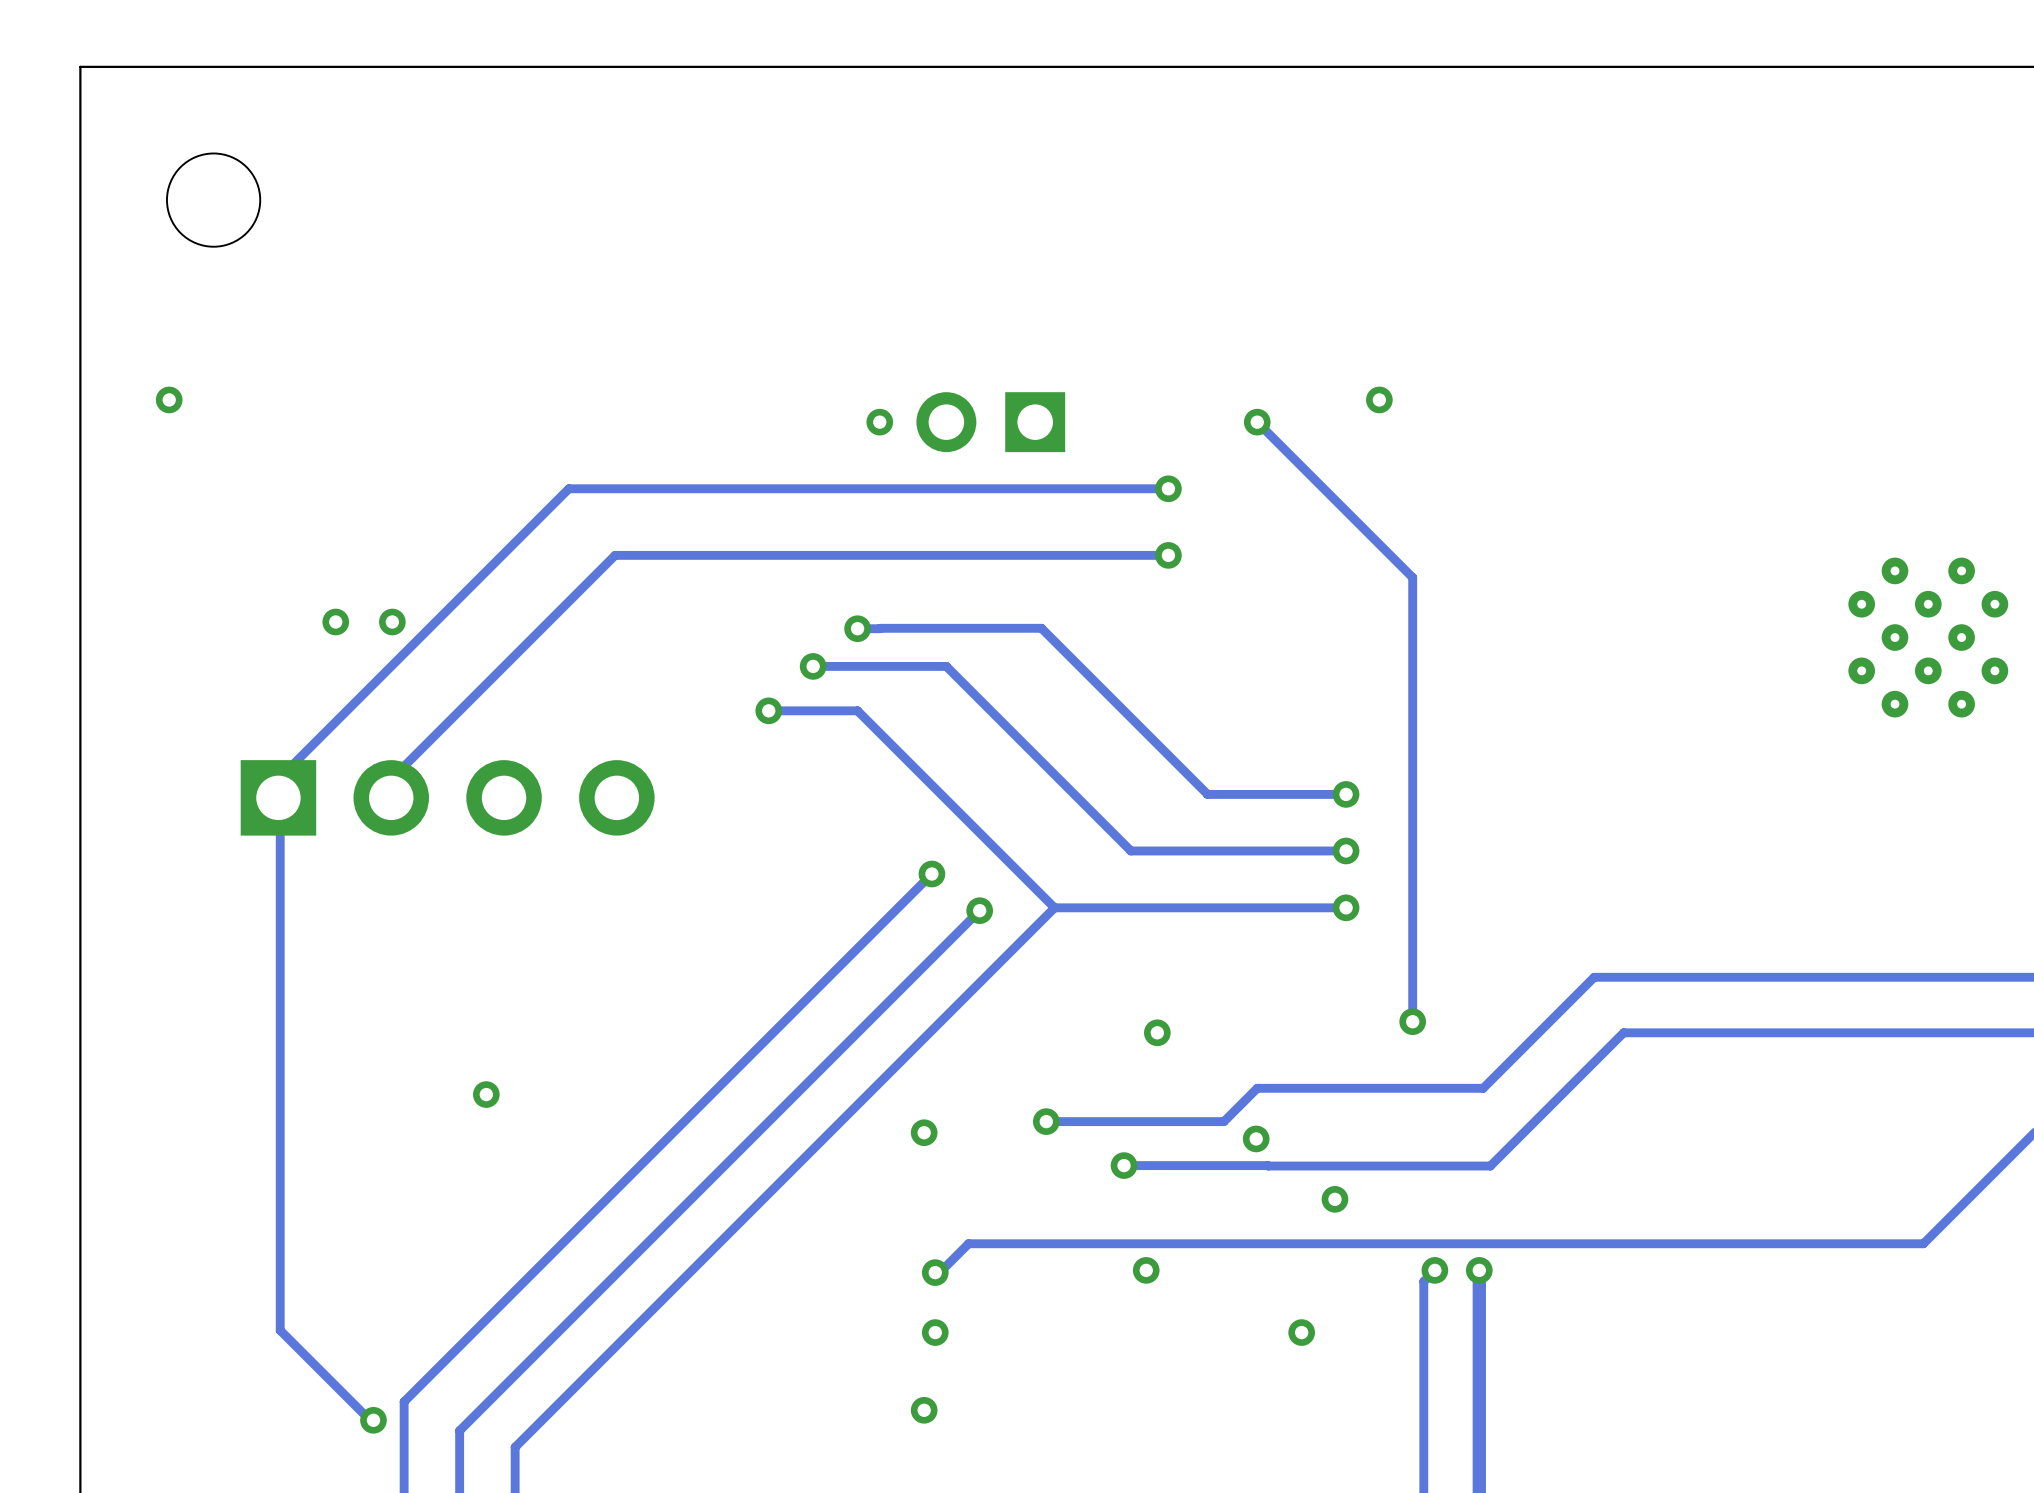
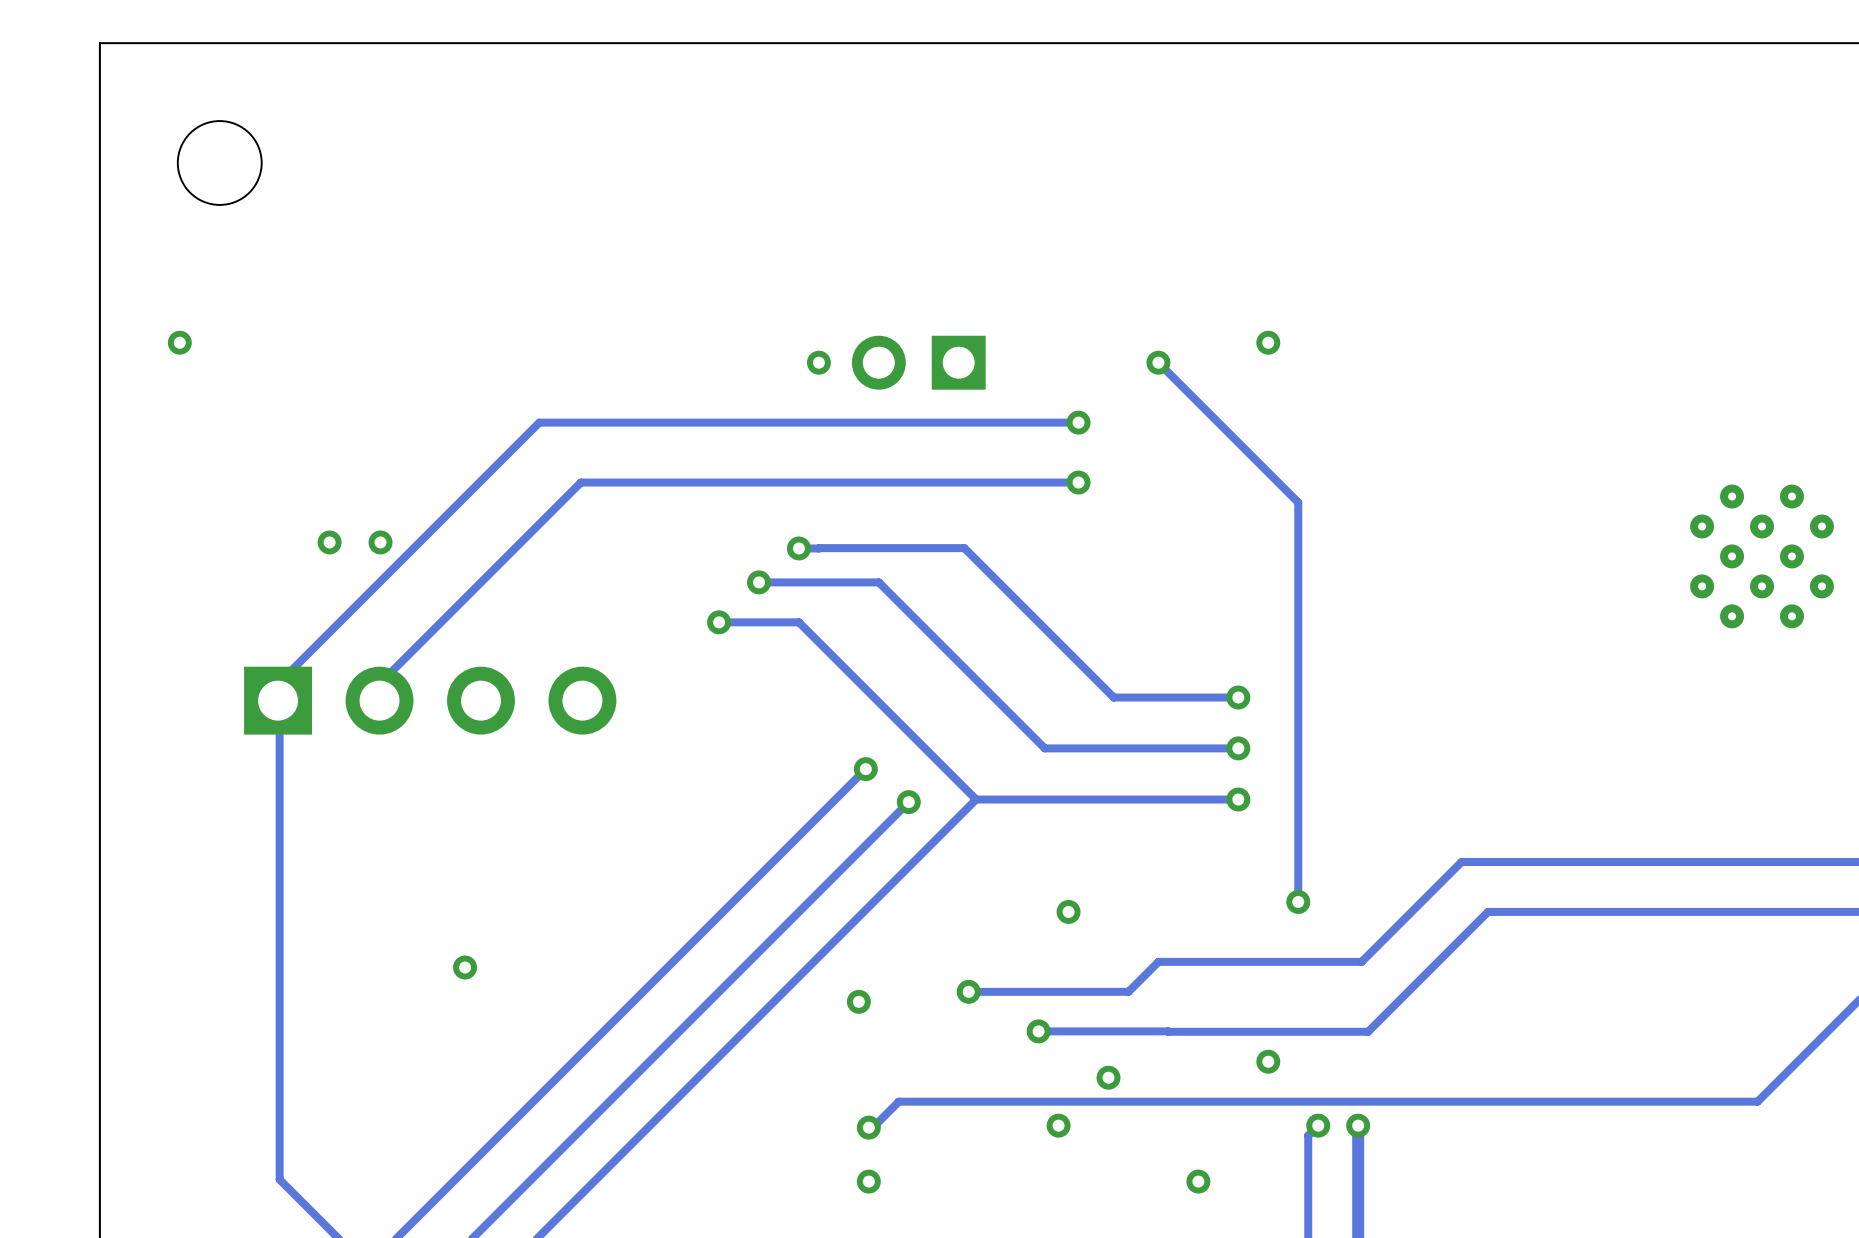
via: (1256, 1138) -> none
via position: (1334, 1199) -> (1268, 1061)
via: none -> (1108, 1077)

